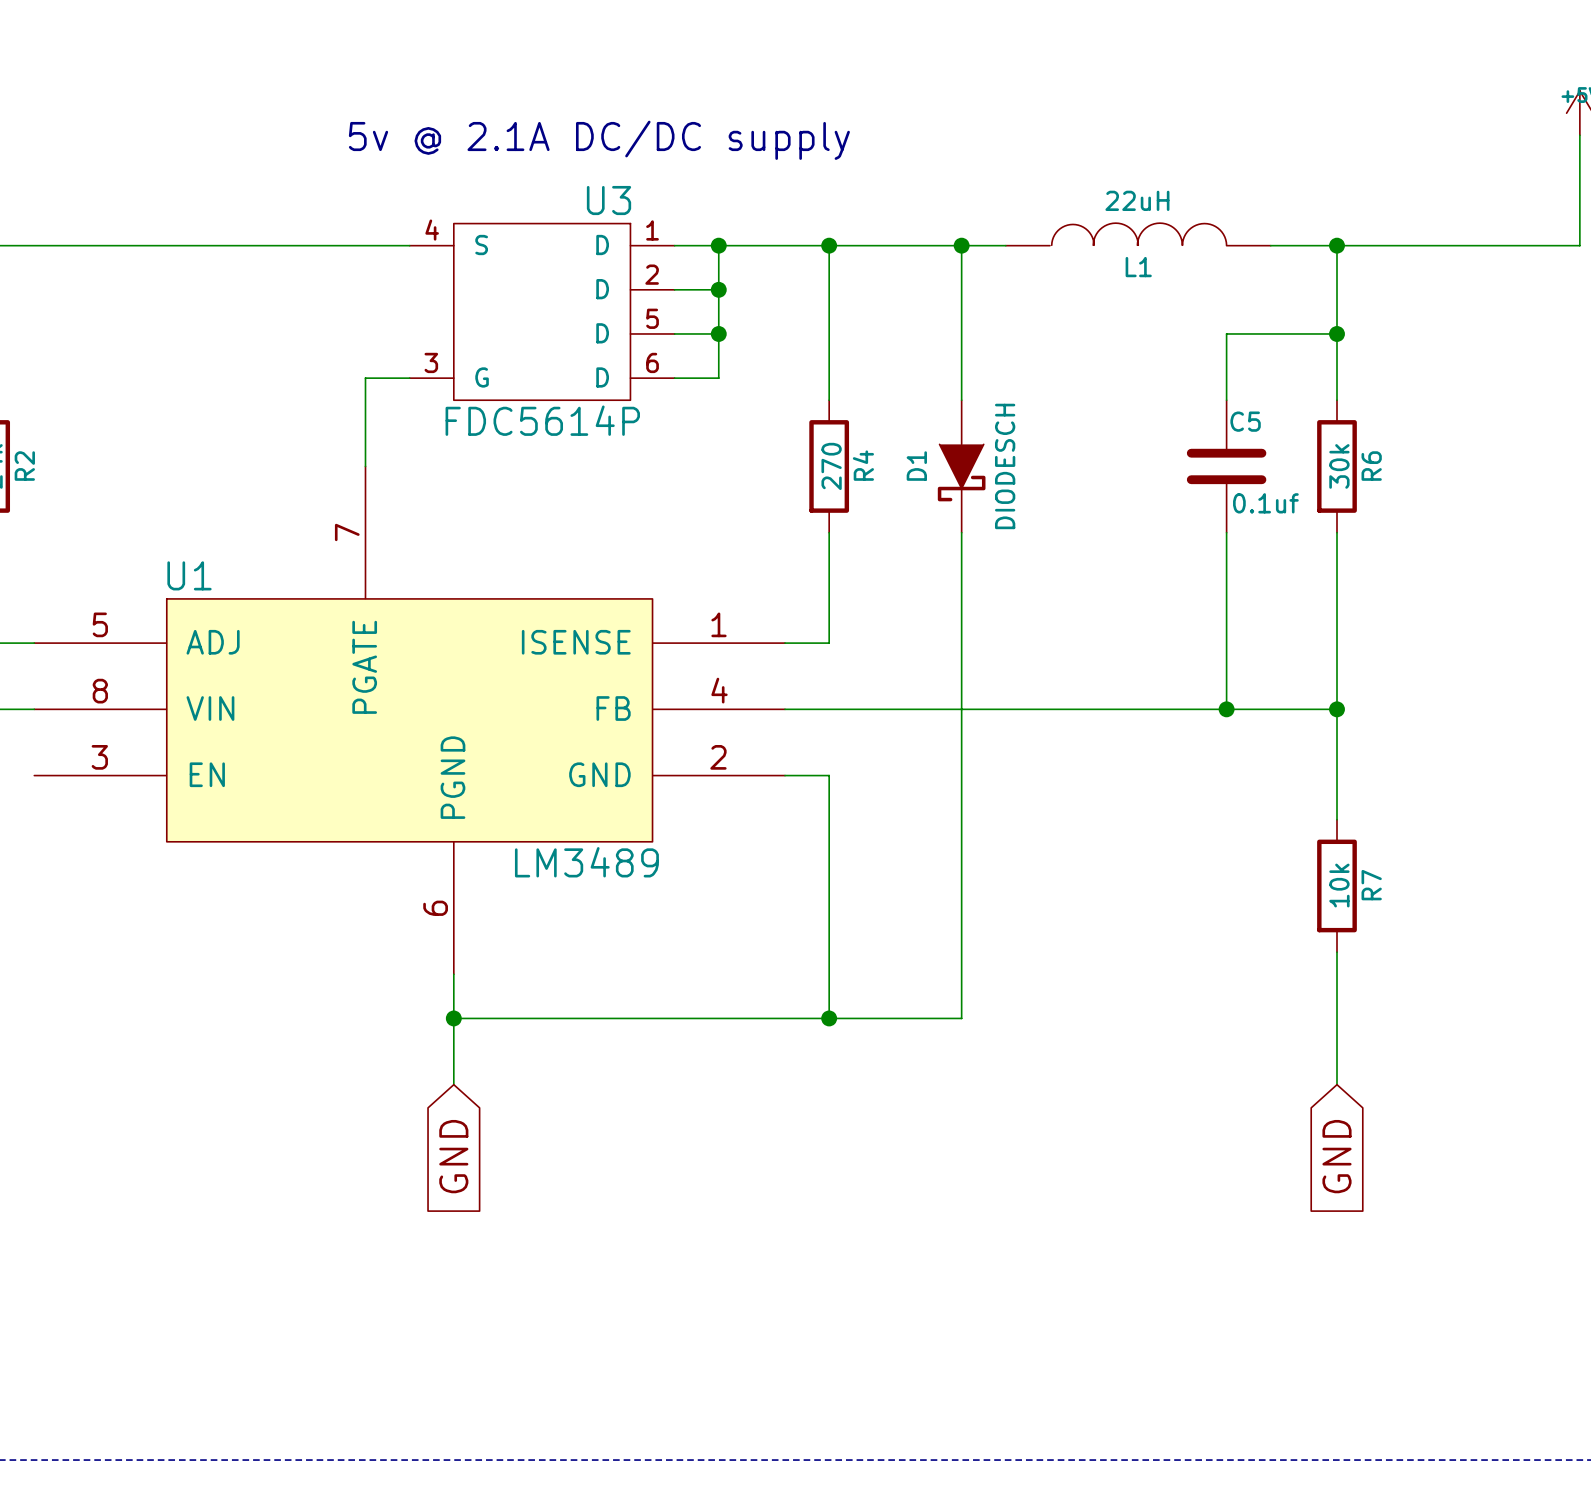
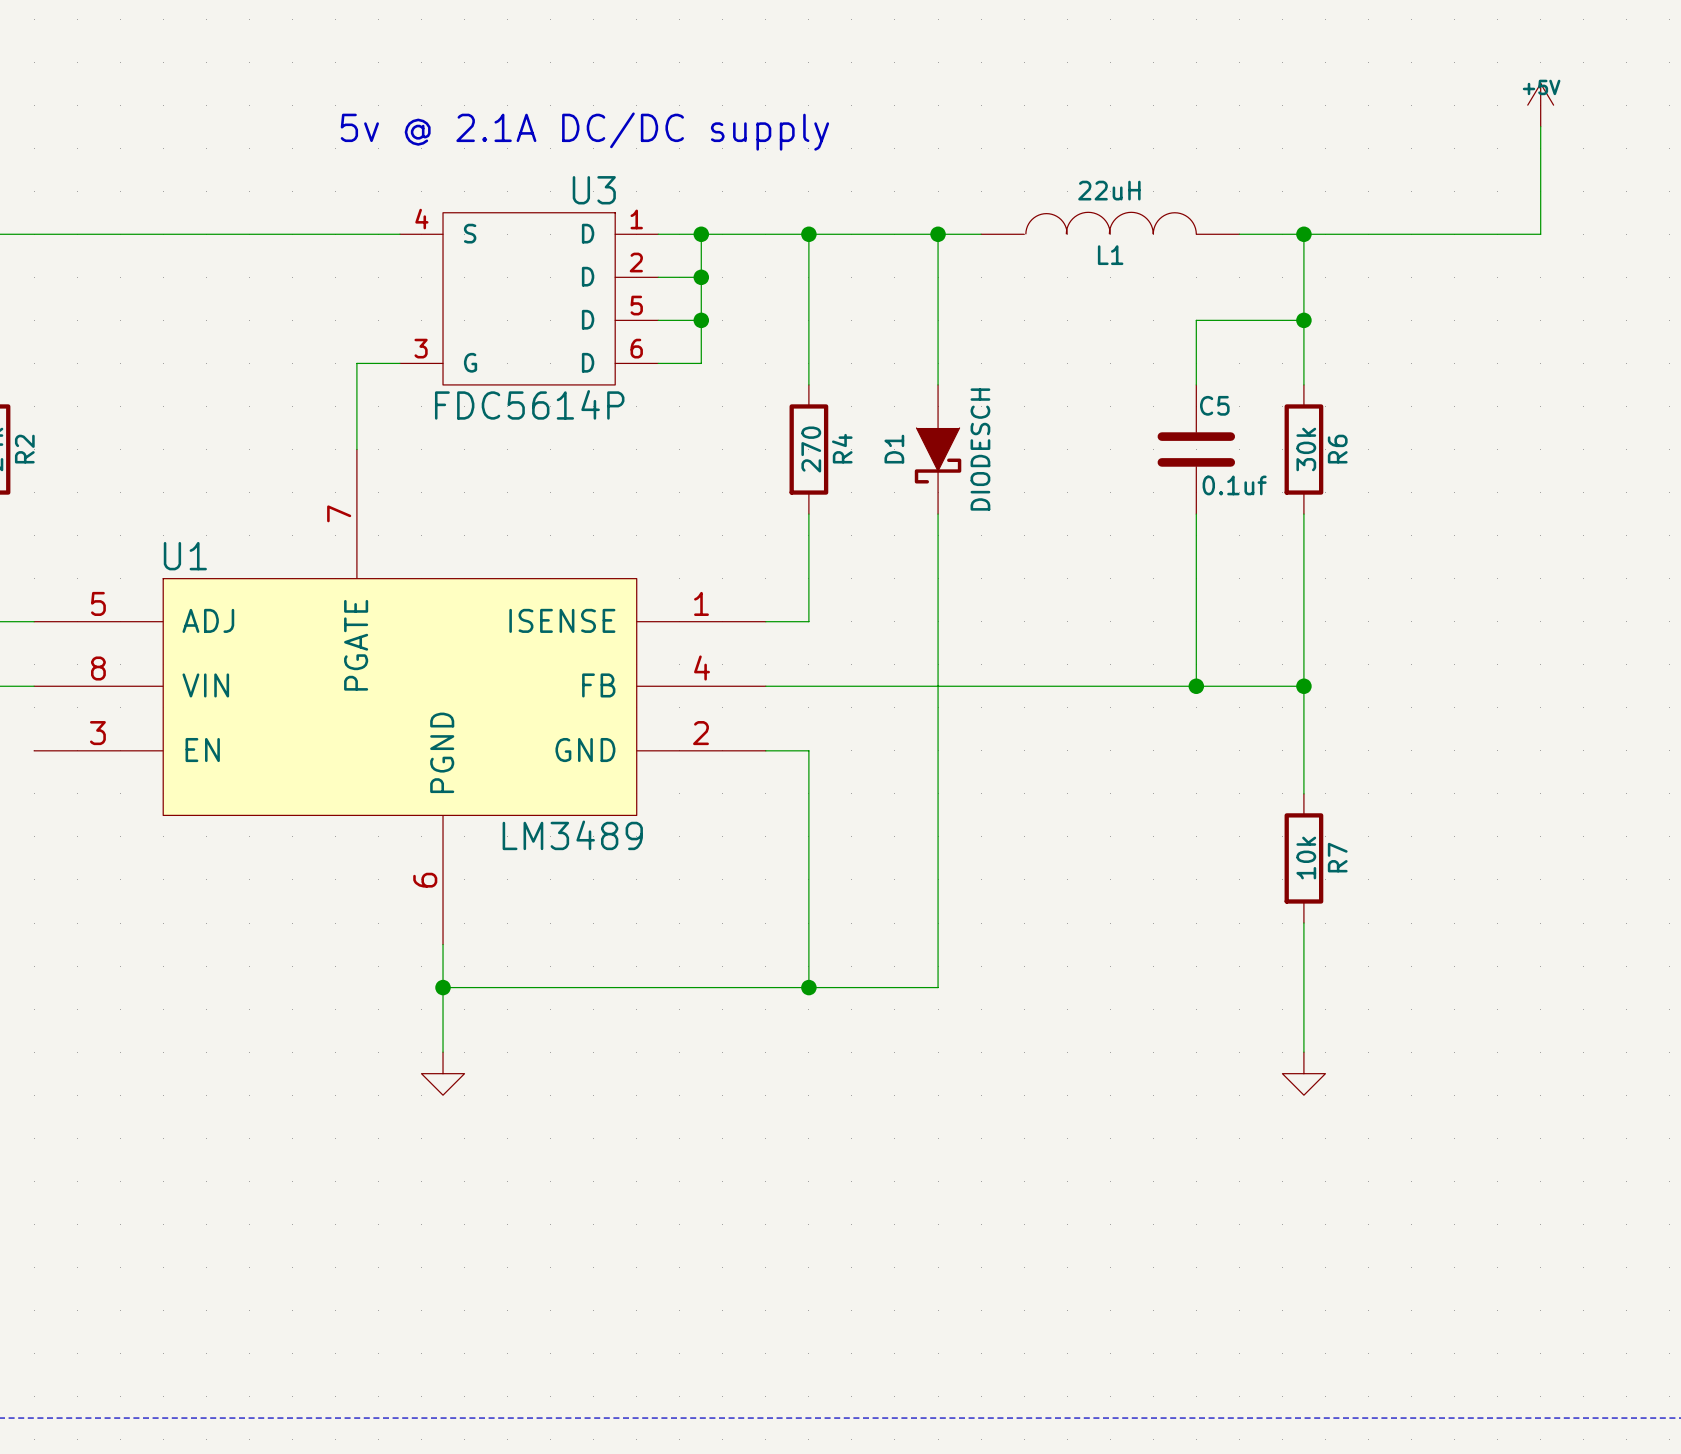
power symbol: none -> (443, 1073)
power symbol: none -> (1303, 1073)
global label: GND (453, 1156) -> none
global label: GND (1336, 1156) -> none

